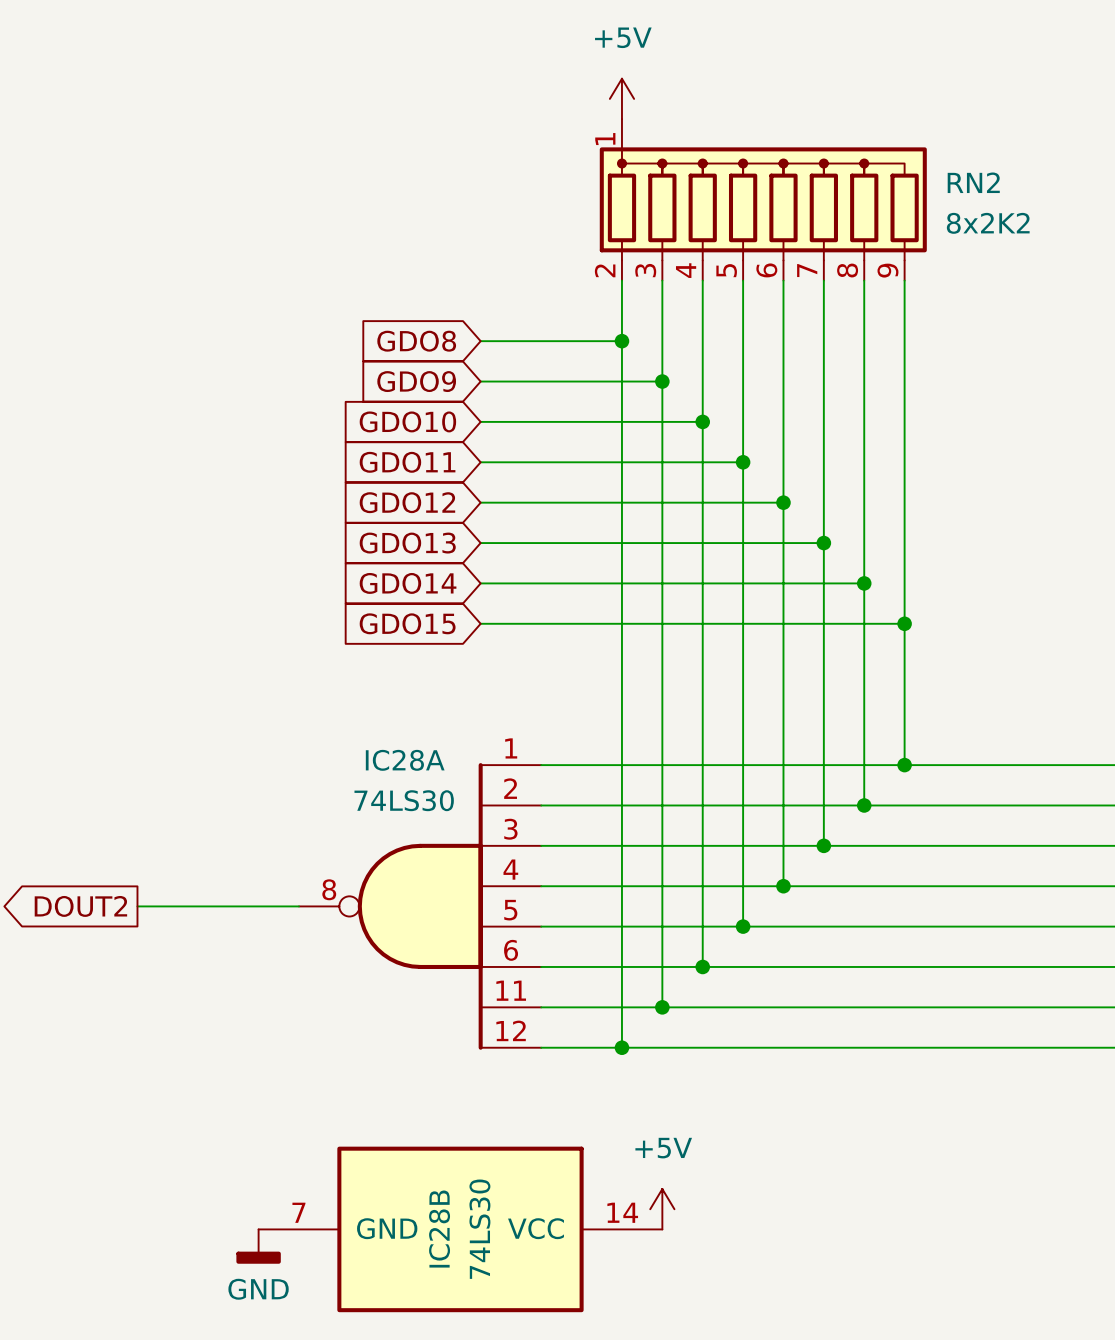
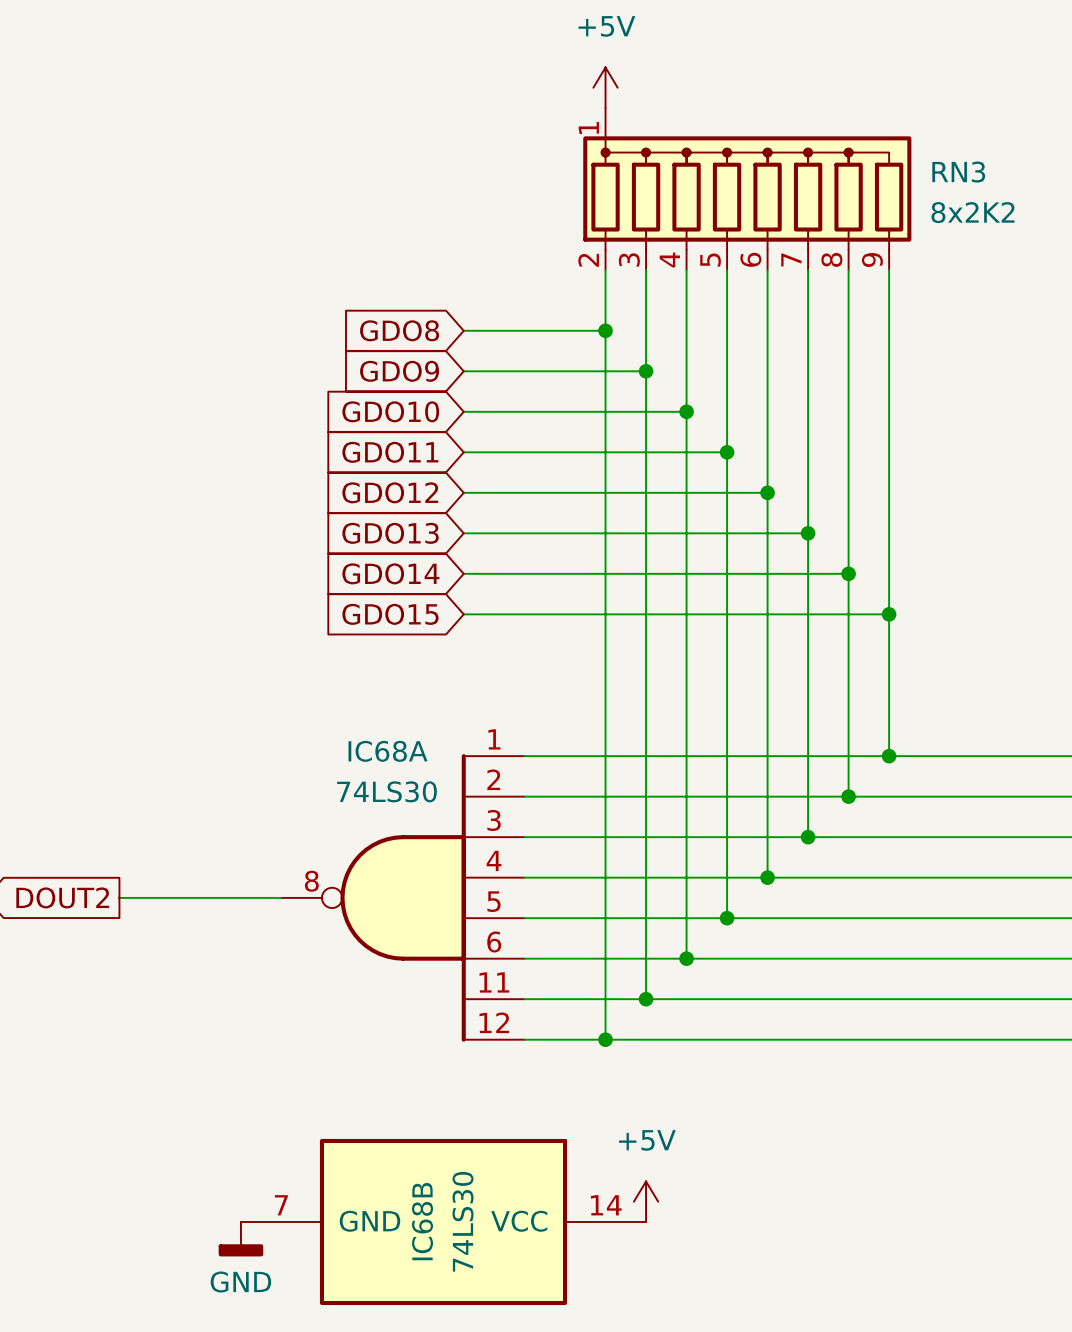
RN2 name: RN2 (973, 182) -> RN3 (958, 172)
IC28A name: IC28A (405, 760) -> IC68A (388, 751)
IC28B name: IC28B (439, 1229) -> IC68B (422, 1221)

